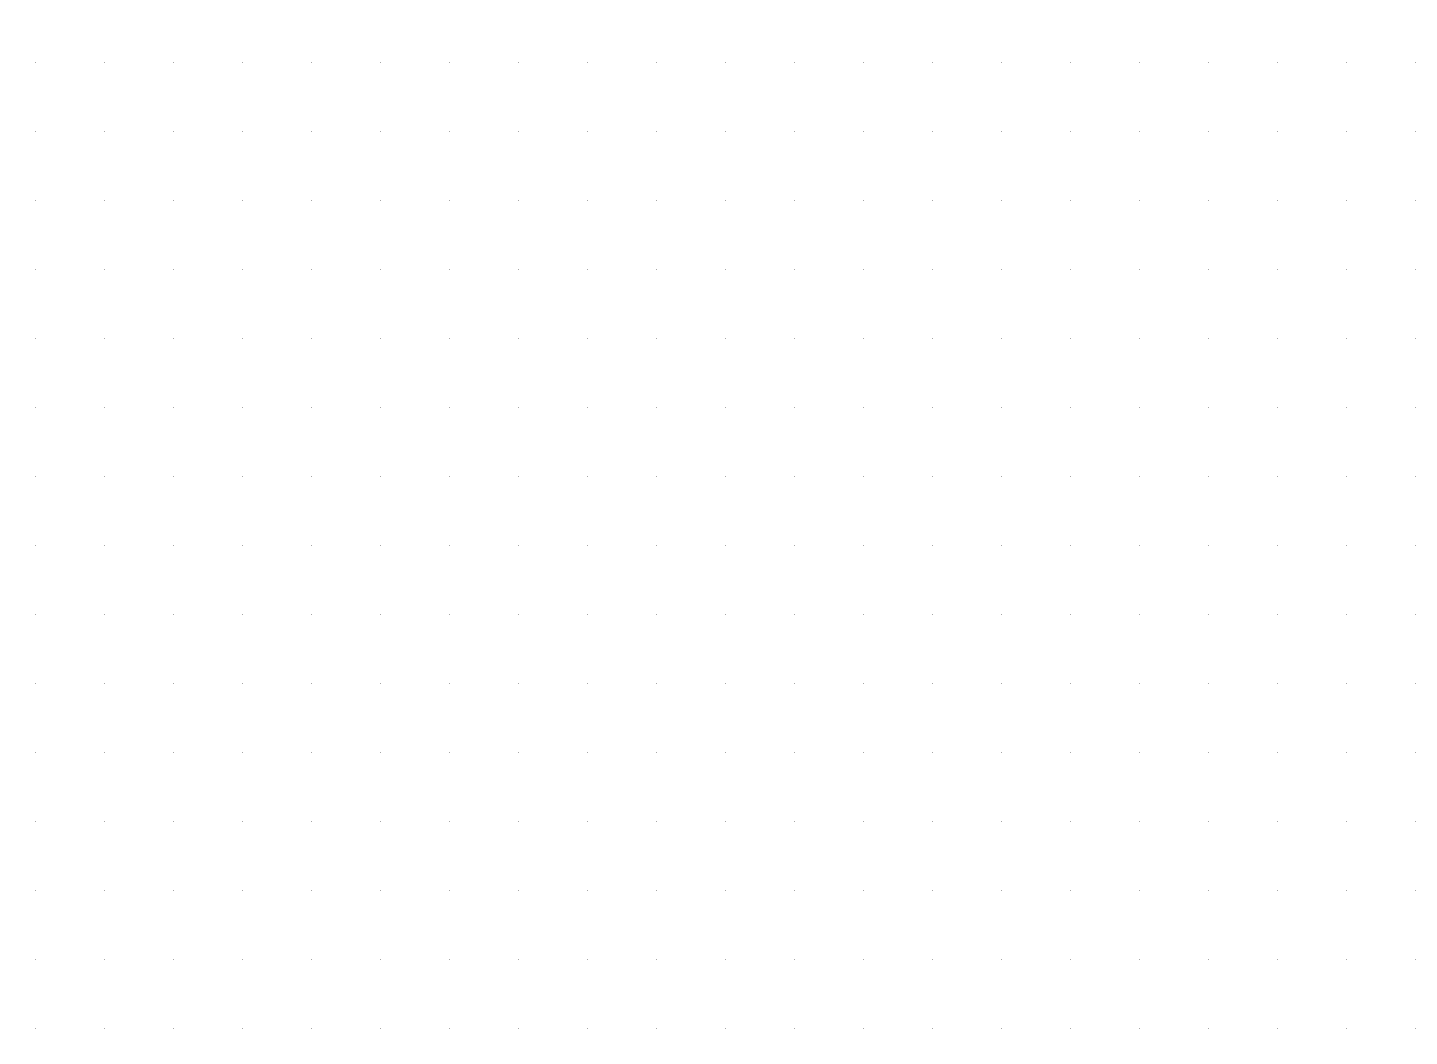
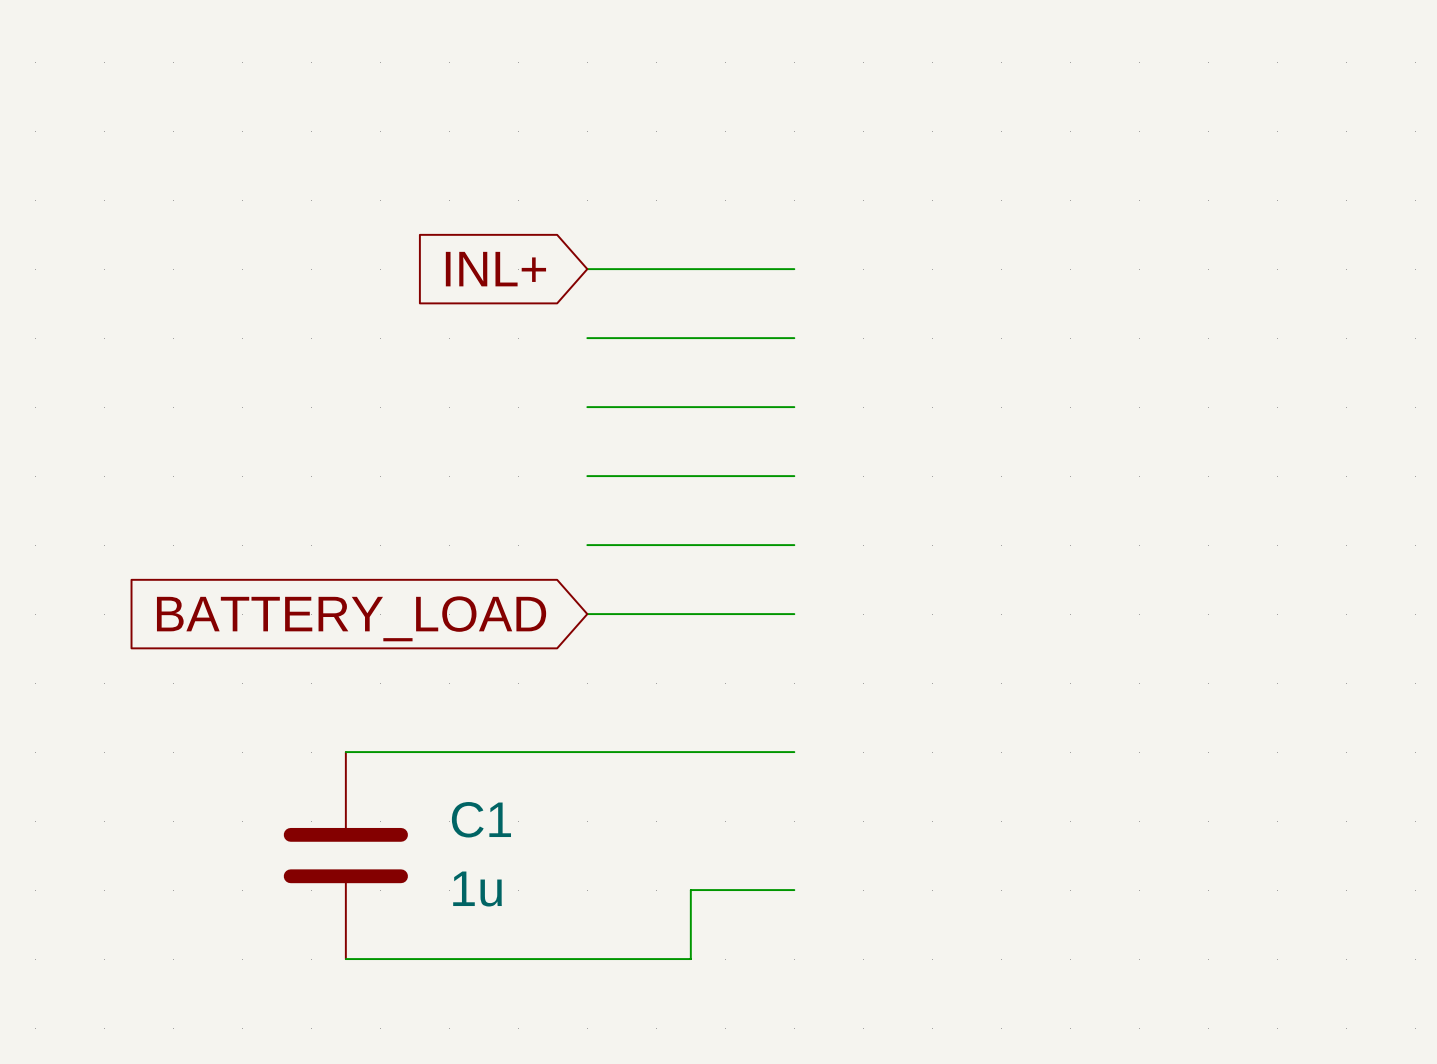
global label: none -> INL+ (495, 269)
wire: none -> (587, 269) (794, 269)
wire: none -> (587, 338) (794, 338)
wire: none -> (587, 407) (794, 407)
wire: none -> (587, 476) (794, 476)
wire: none -> (587, 545) (794, 545)
wire: none -> (587, 614) (794, 614)
global label: none -> BATTERY_LOAD (351, 618)
wire: none -> (345, 752) (794, 752)
C1: none -> 1u (345, 855)
wire: none -> (794, 890) (690, 890) (690, 959) (345, 959)

